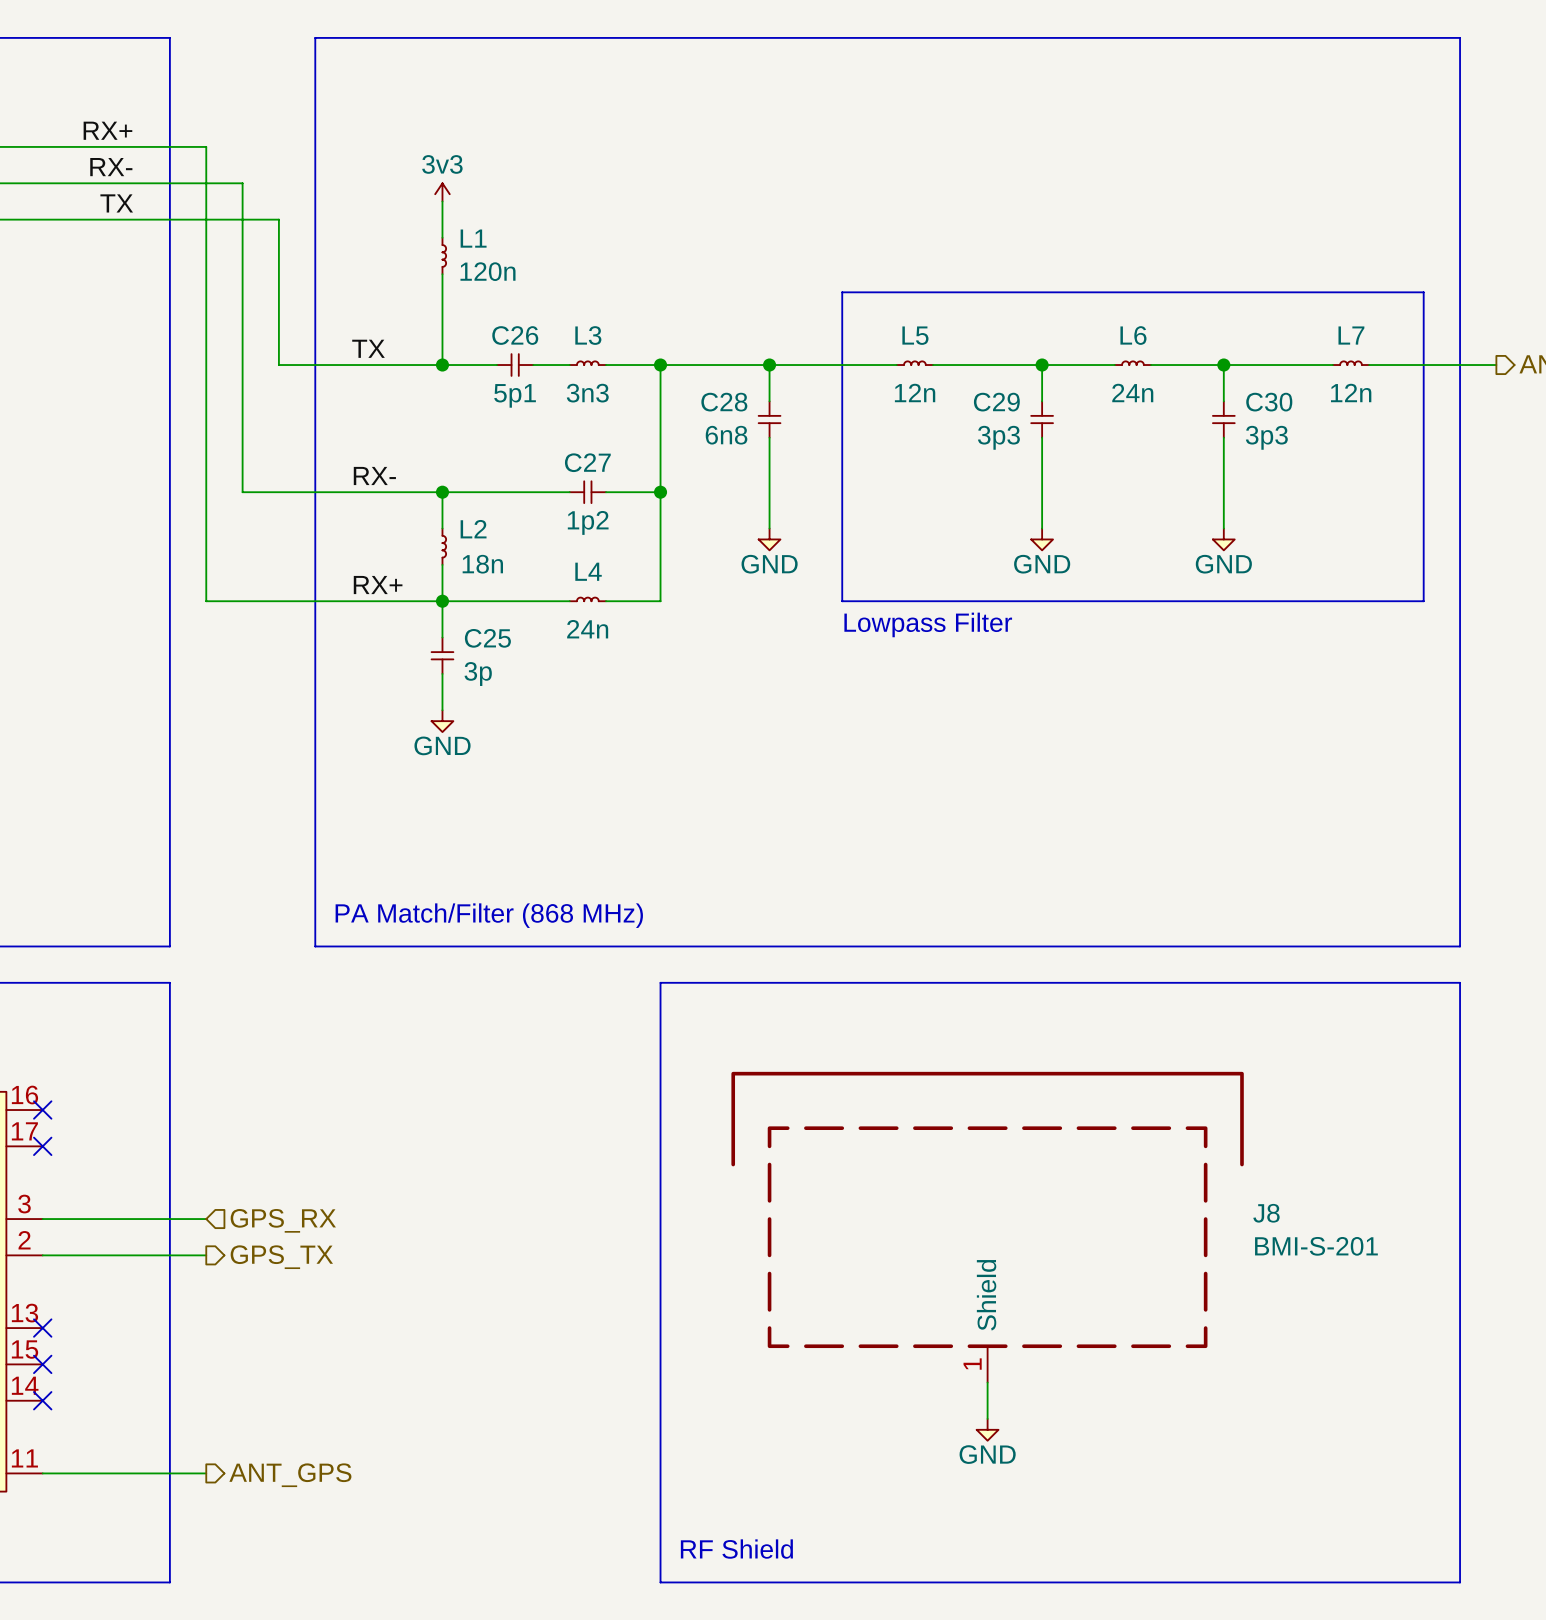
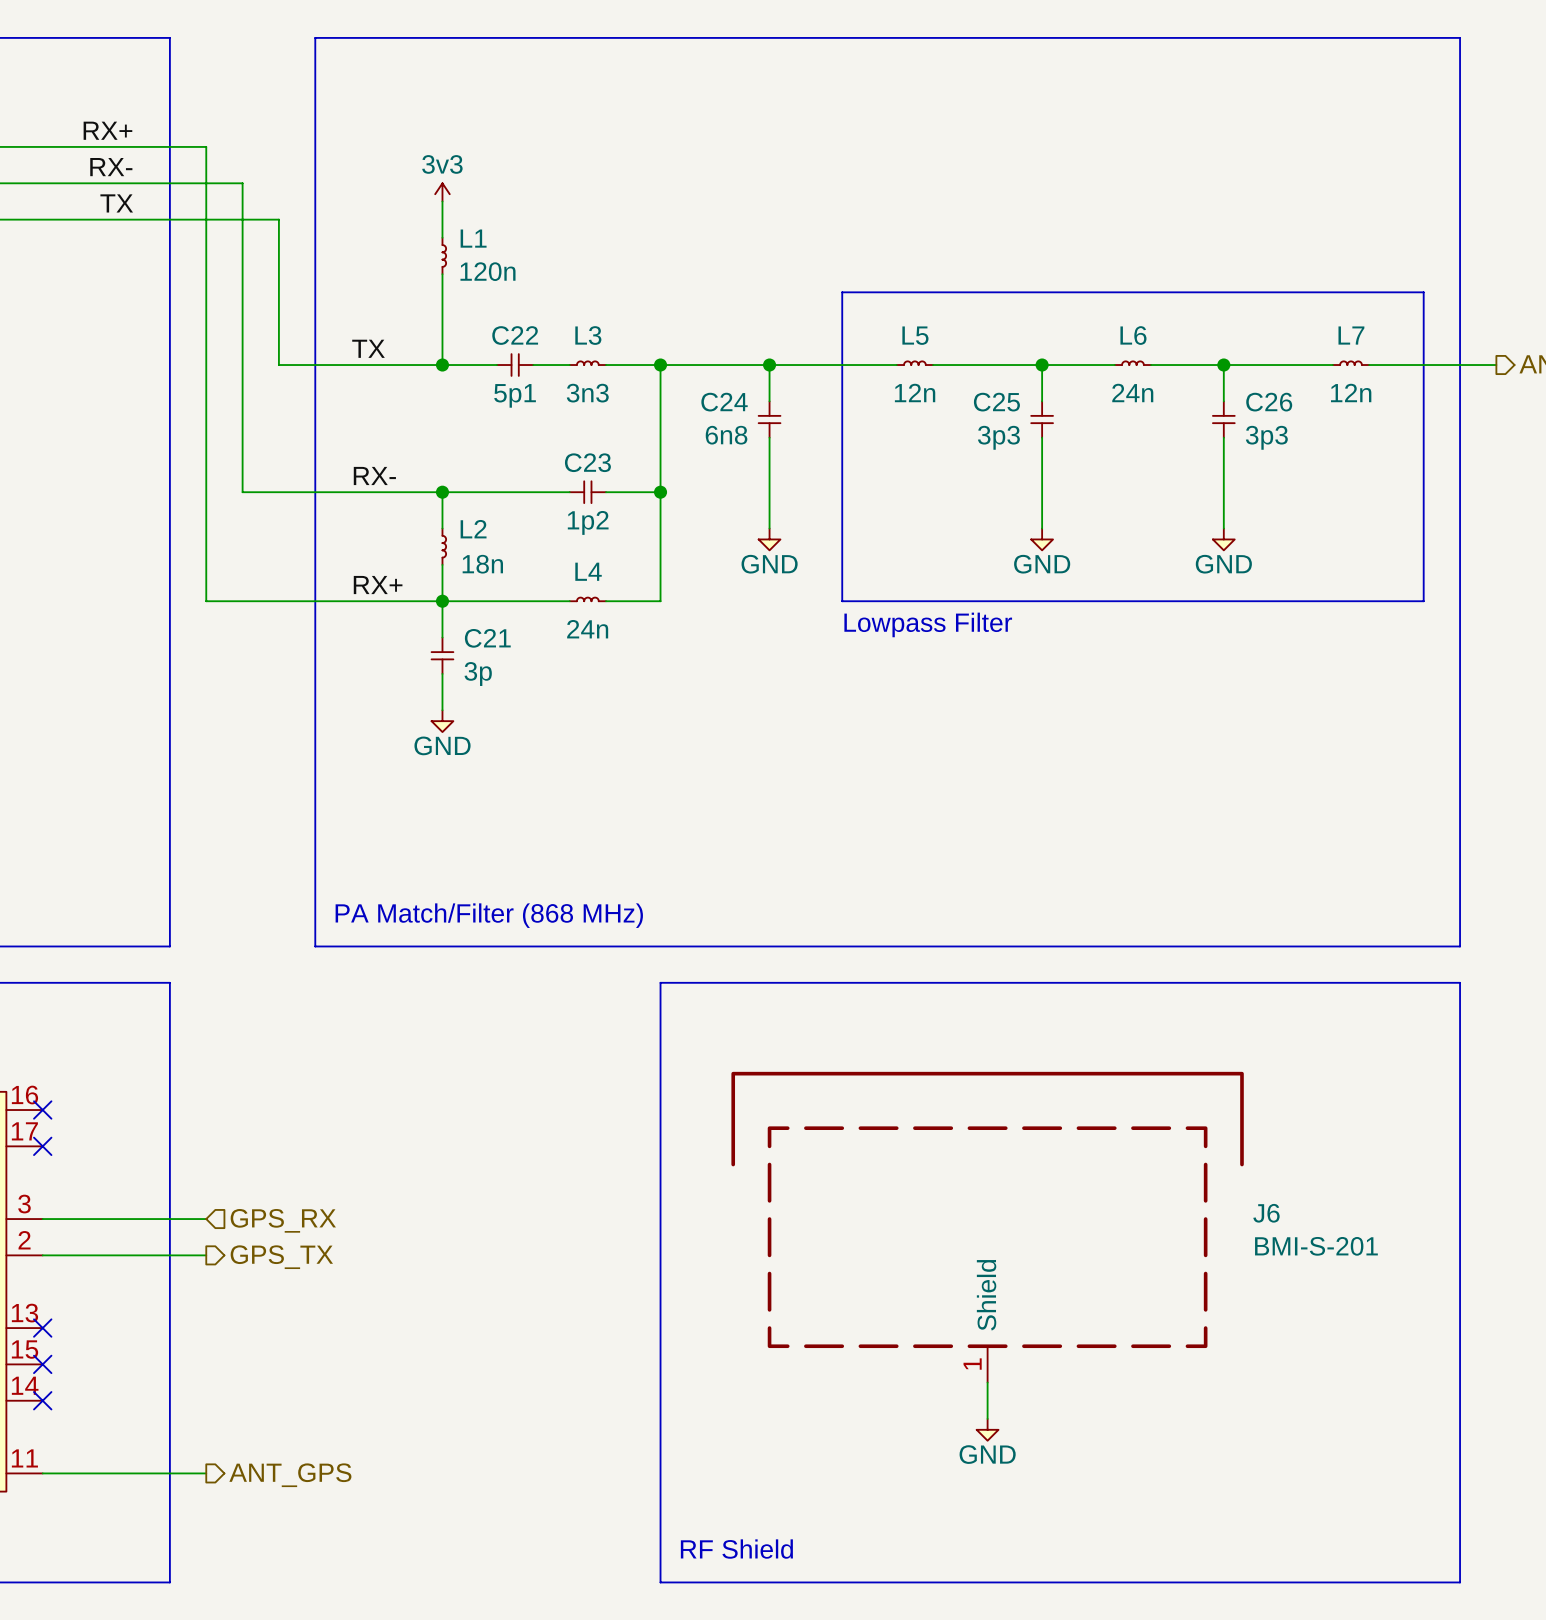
C26 name: C26 (515, 335) -> C22 (515, 335)
C28 name: C28 (724, 402) -> C24 (724, 402)
C29 name: C29 (996, 402) -> C25 (996, 402)
C30 name: C30 (1269, 402) -> C26 (1269, 402)
C27 name: C27 (587, 462) -> C23 (587, 462)
C25 name: C25 (487, 638) -> C21 (487, 638)
J8 name: J8 (1266, 1213) -> J6 (1266, 1213)

